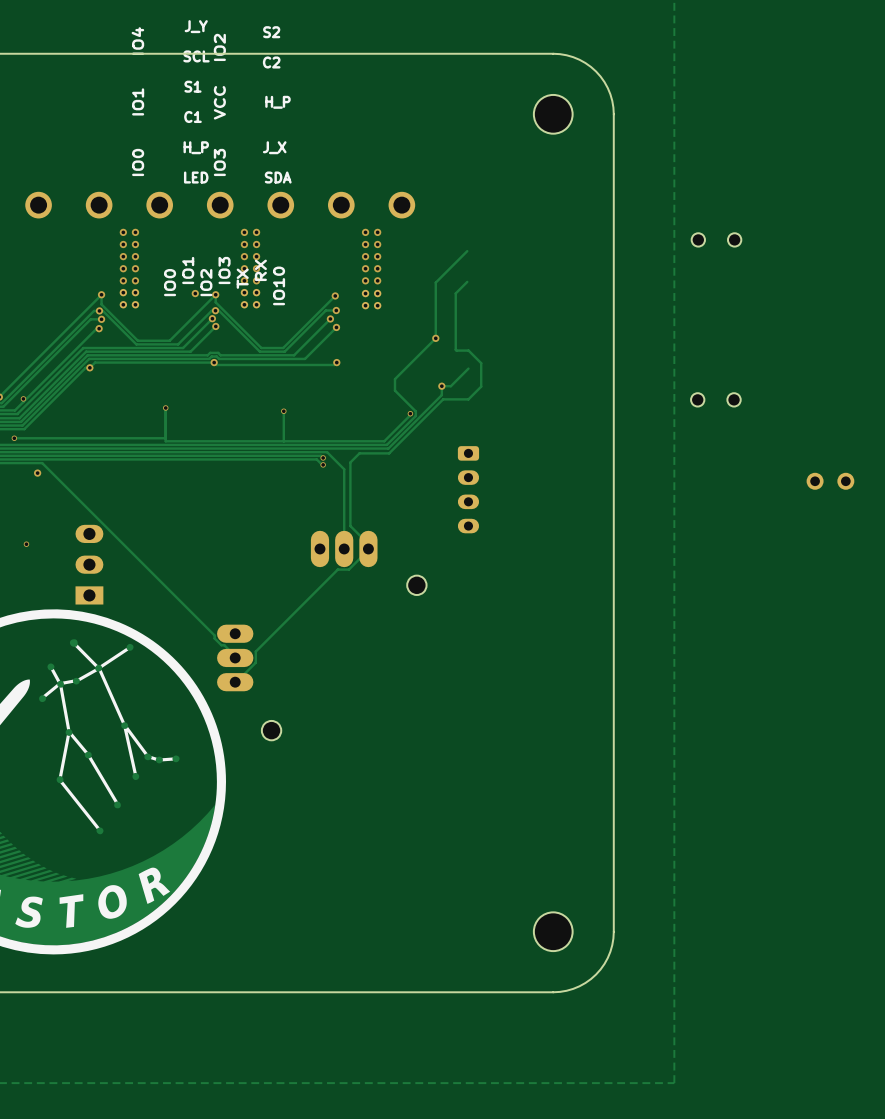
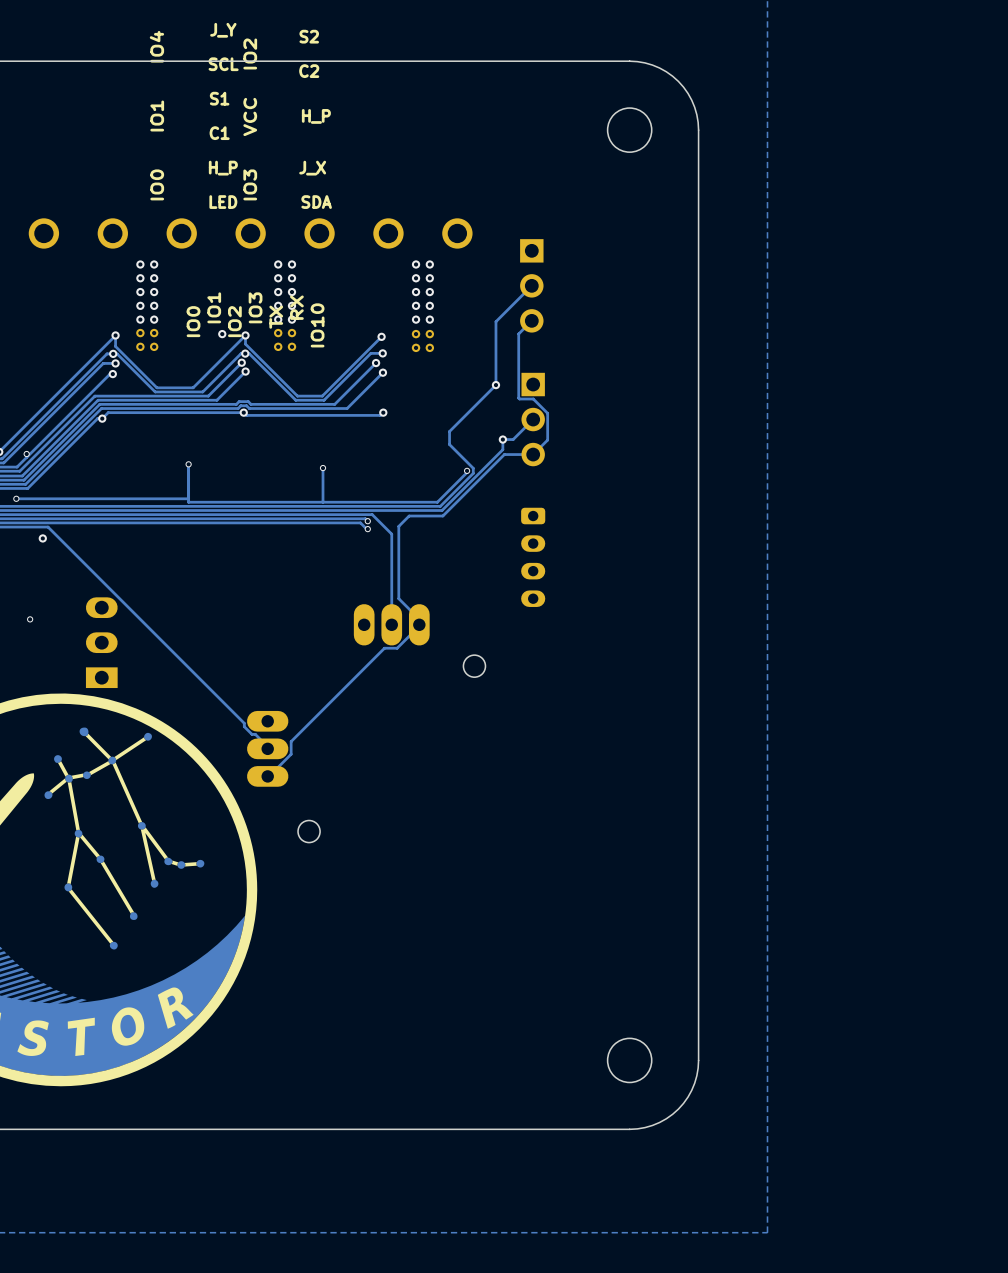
part: (716, 239) -> none
part: none -> (531, 285)
part: none -> (533, 419)
part: (715, 399) -> none
part: (830, 481) -> none

